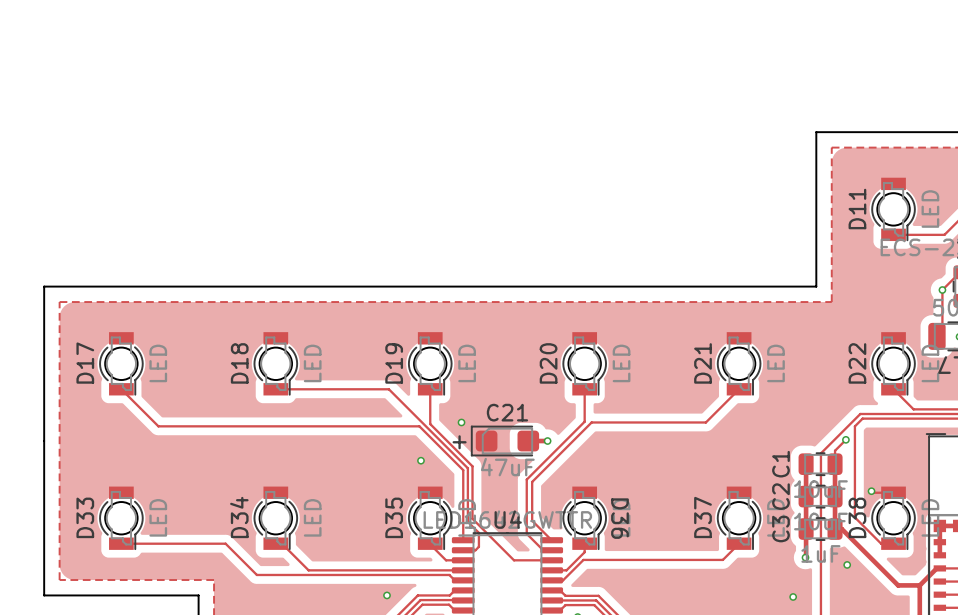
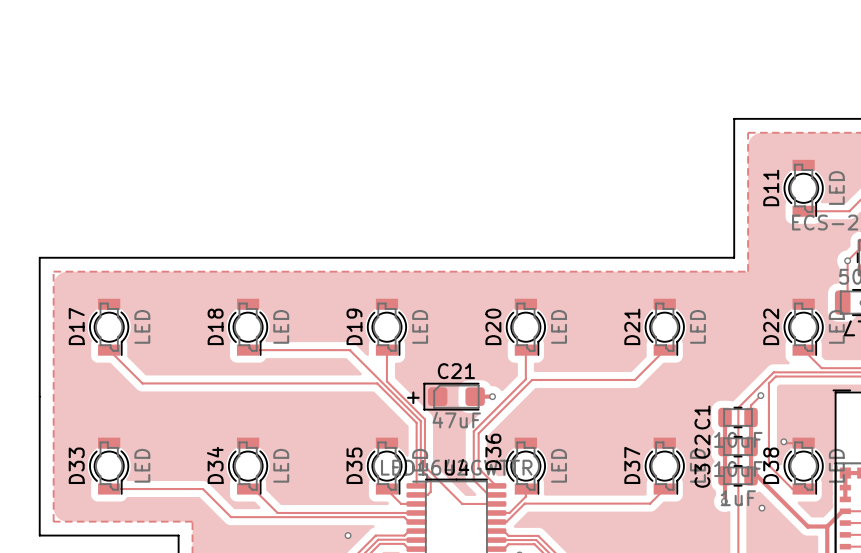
via: (461, 422) -> none
via: (420, 460) -> none
D36 name rotation: 0° (619, 518) -> 180° (493, 451)
D36 name position: D36 (619, 518) -> D36 (493, 451)
via: (793, 596) -> none

